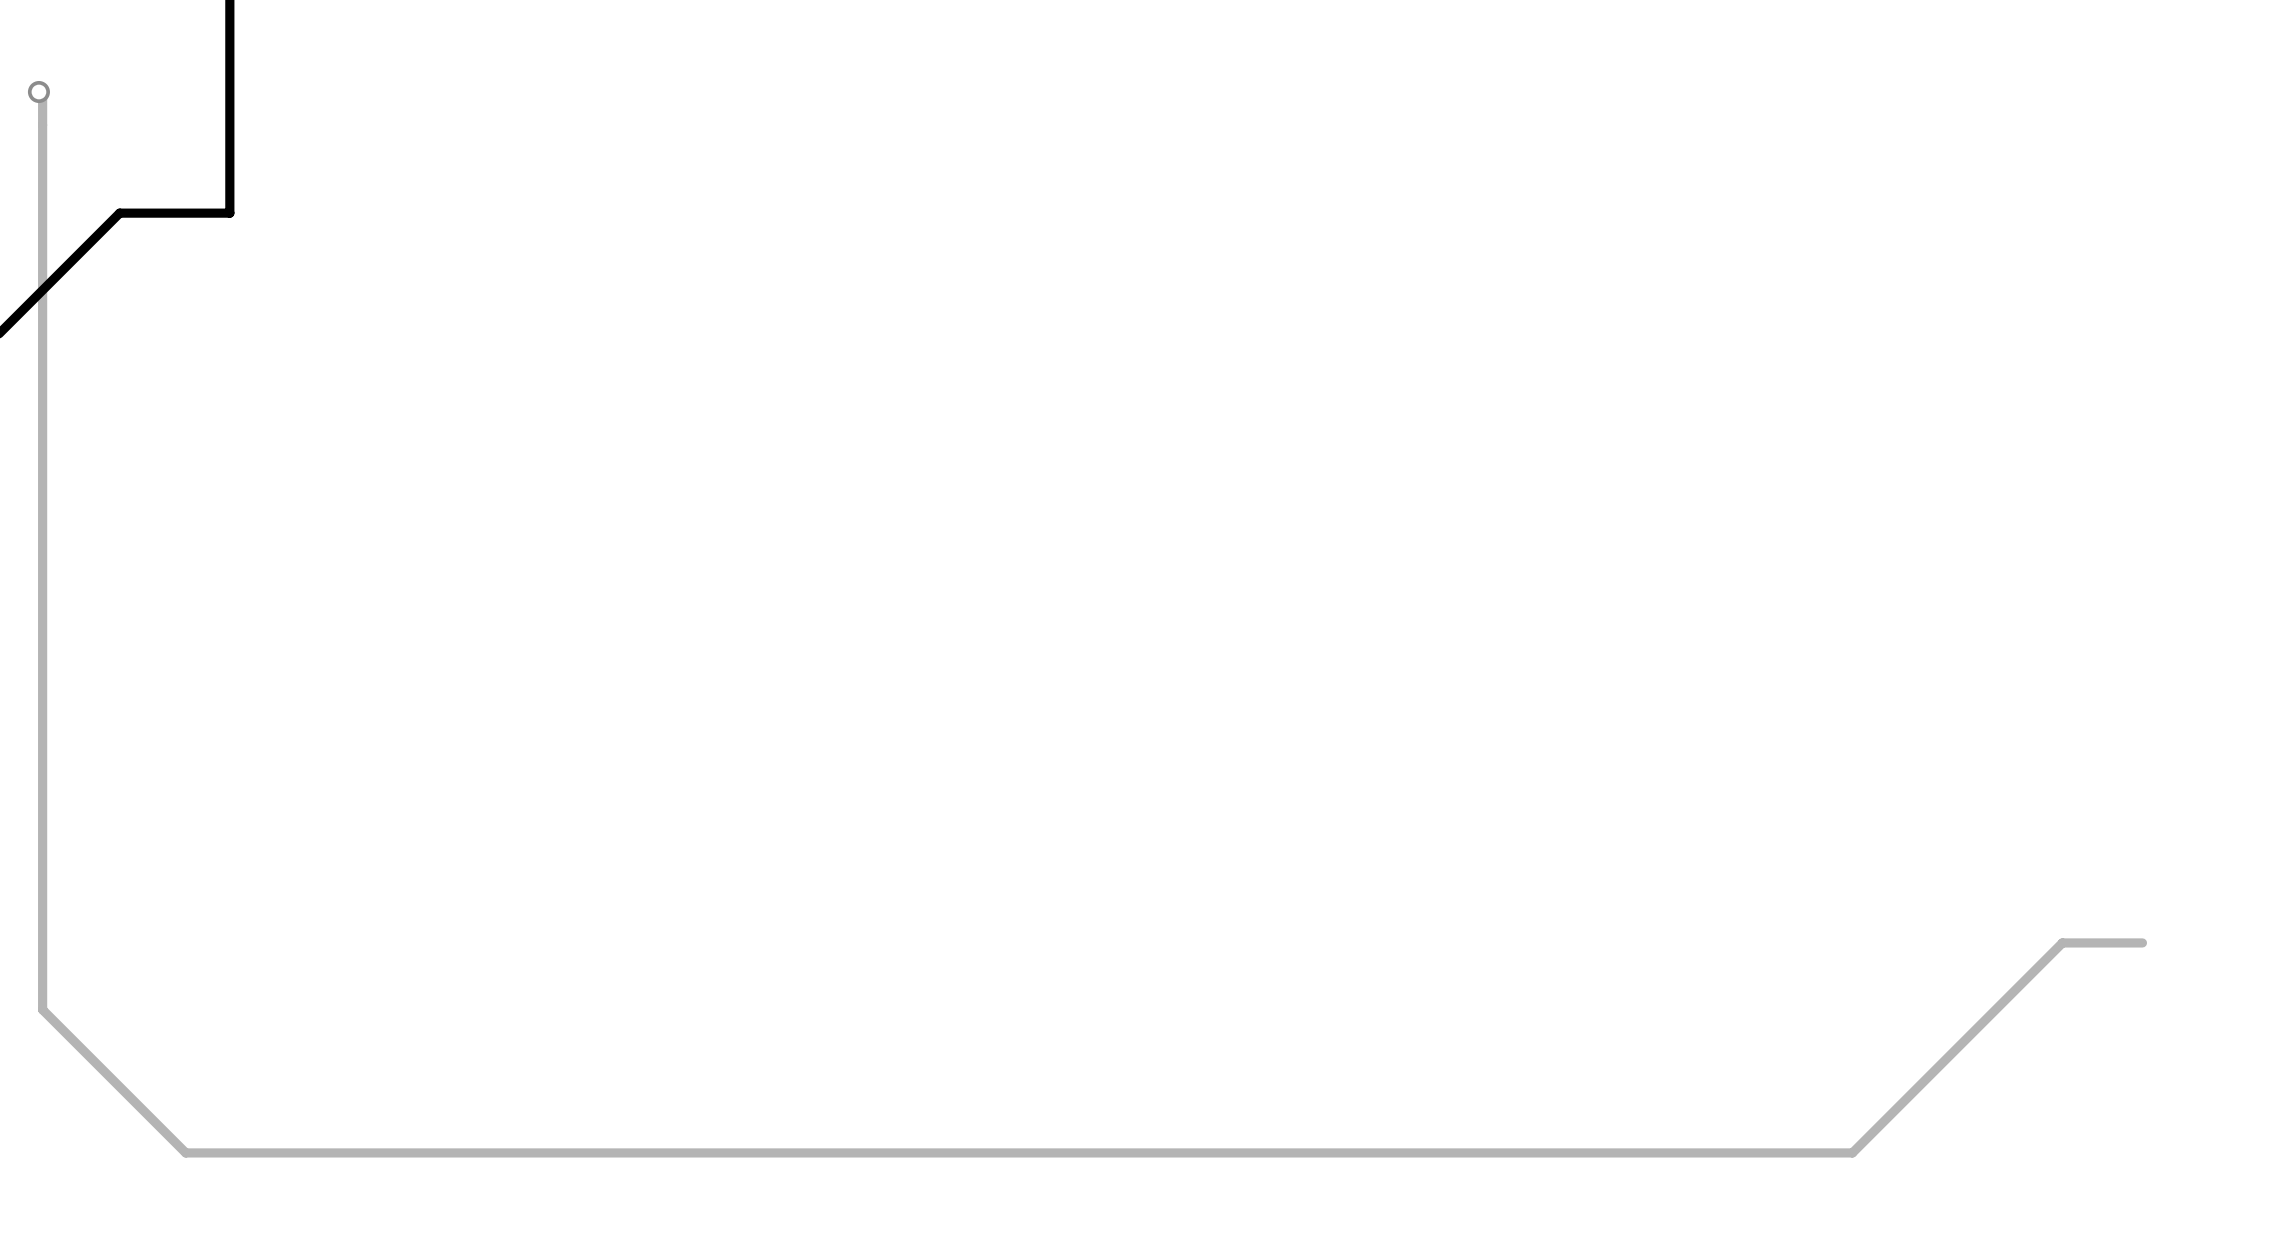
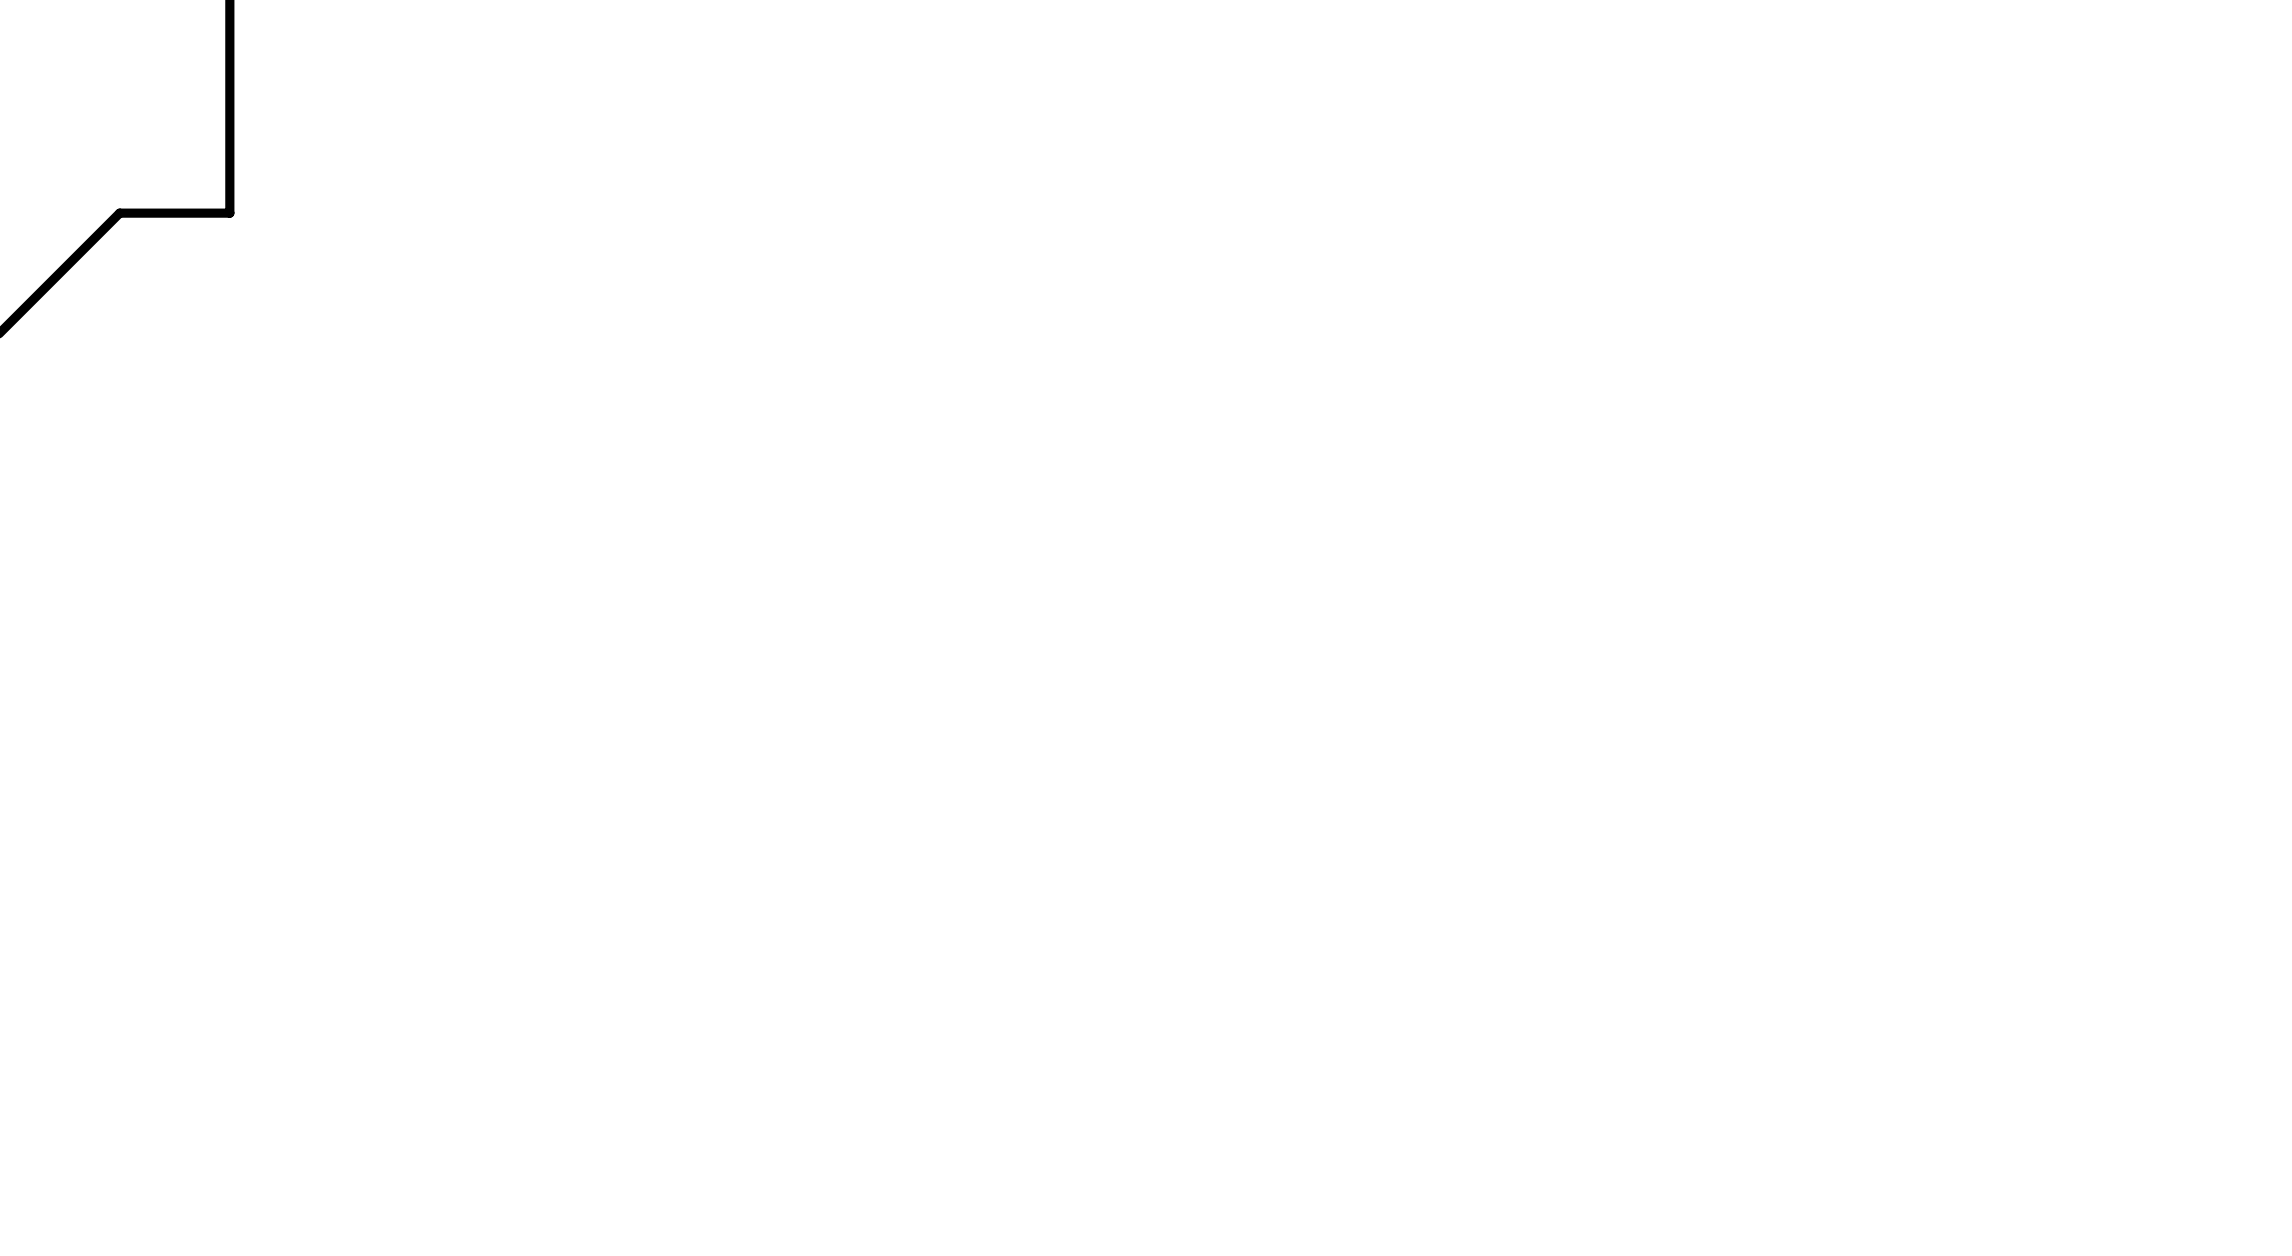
track: (38, 92) (42, 95) (42, 1009) (185, 1152) (1852, 1152) (2062, 942) (2142, 942) -> none
via: (38, 92) -> none

